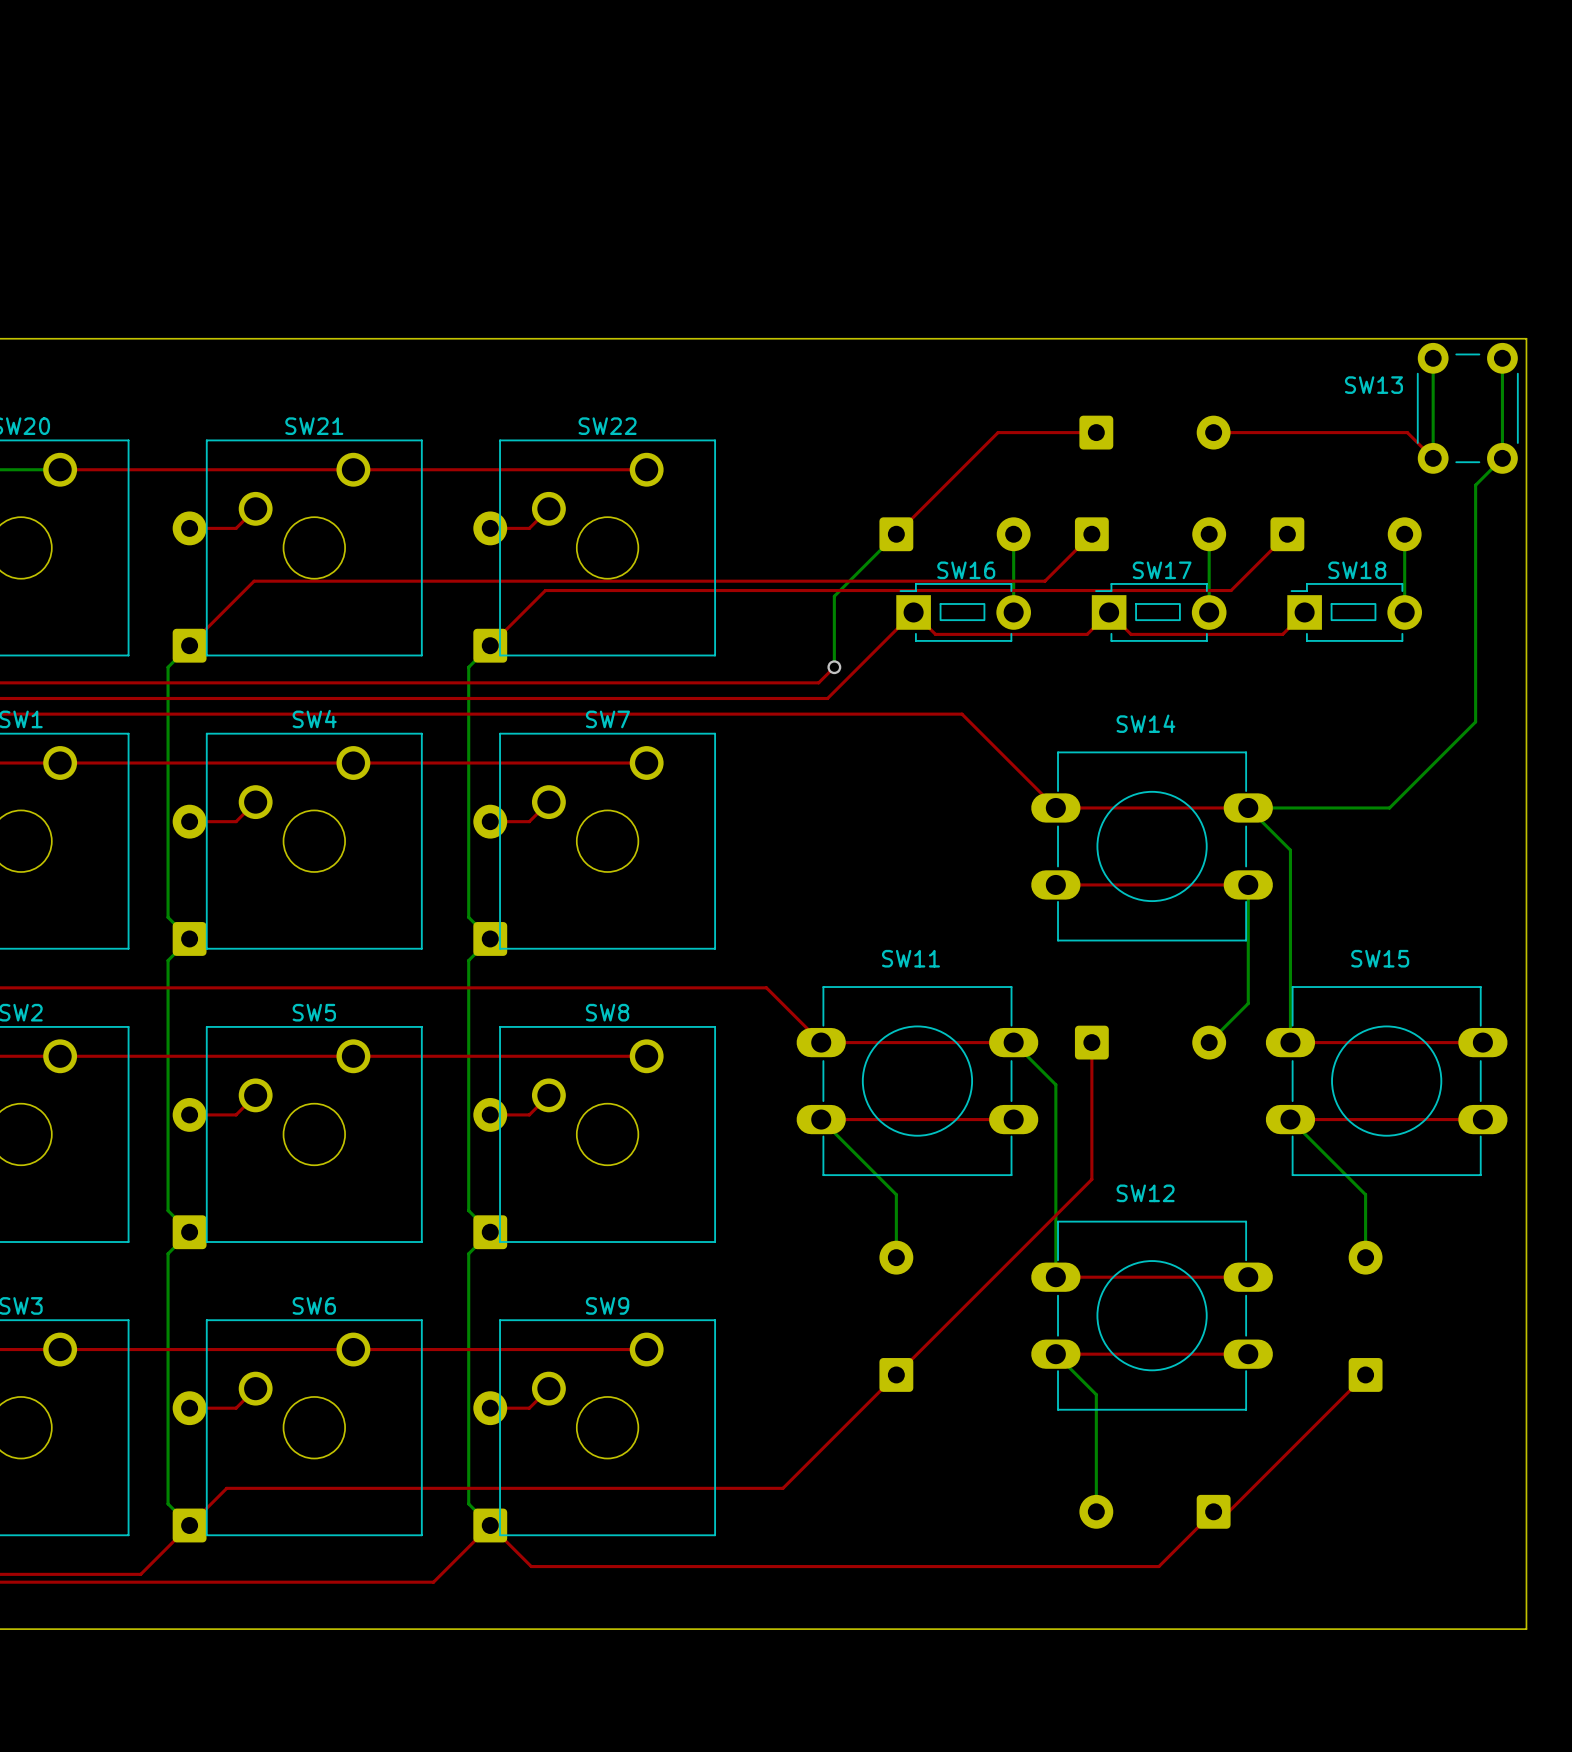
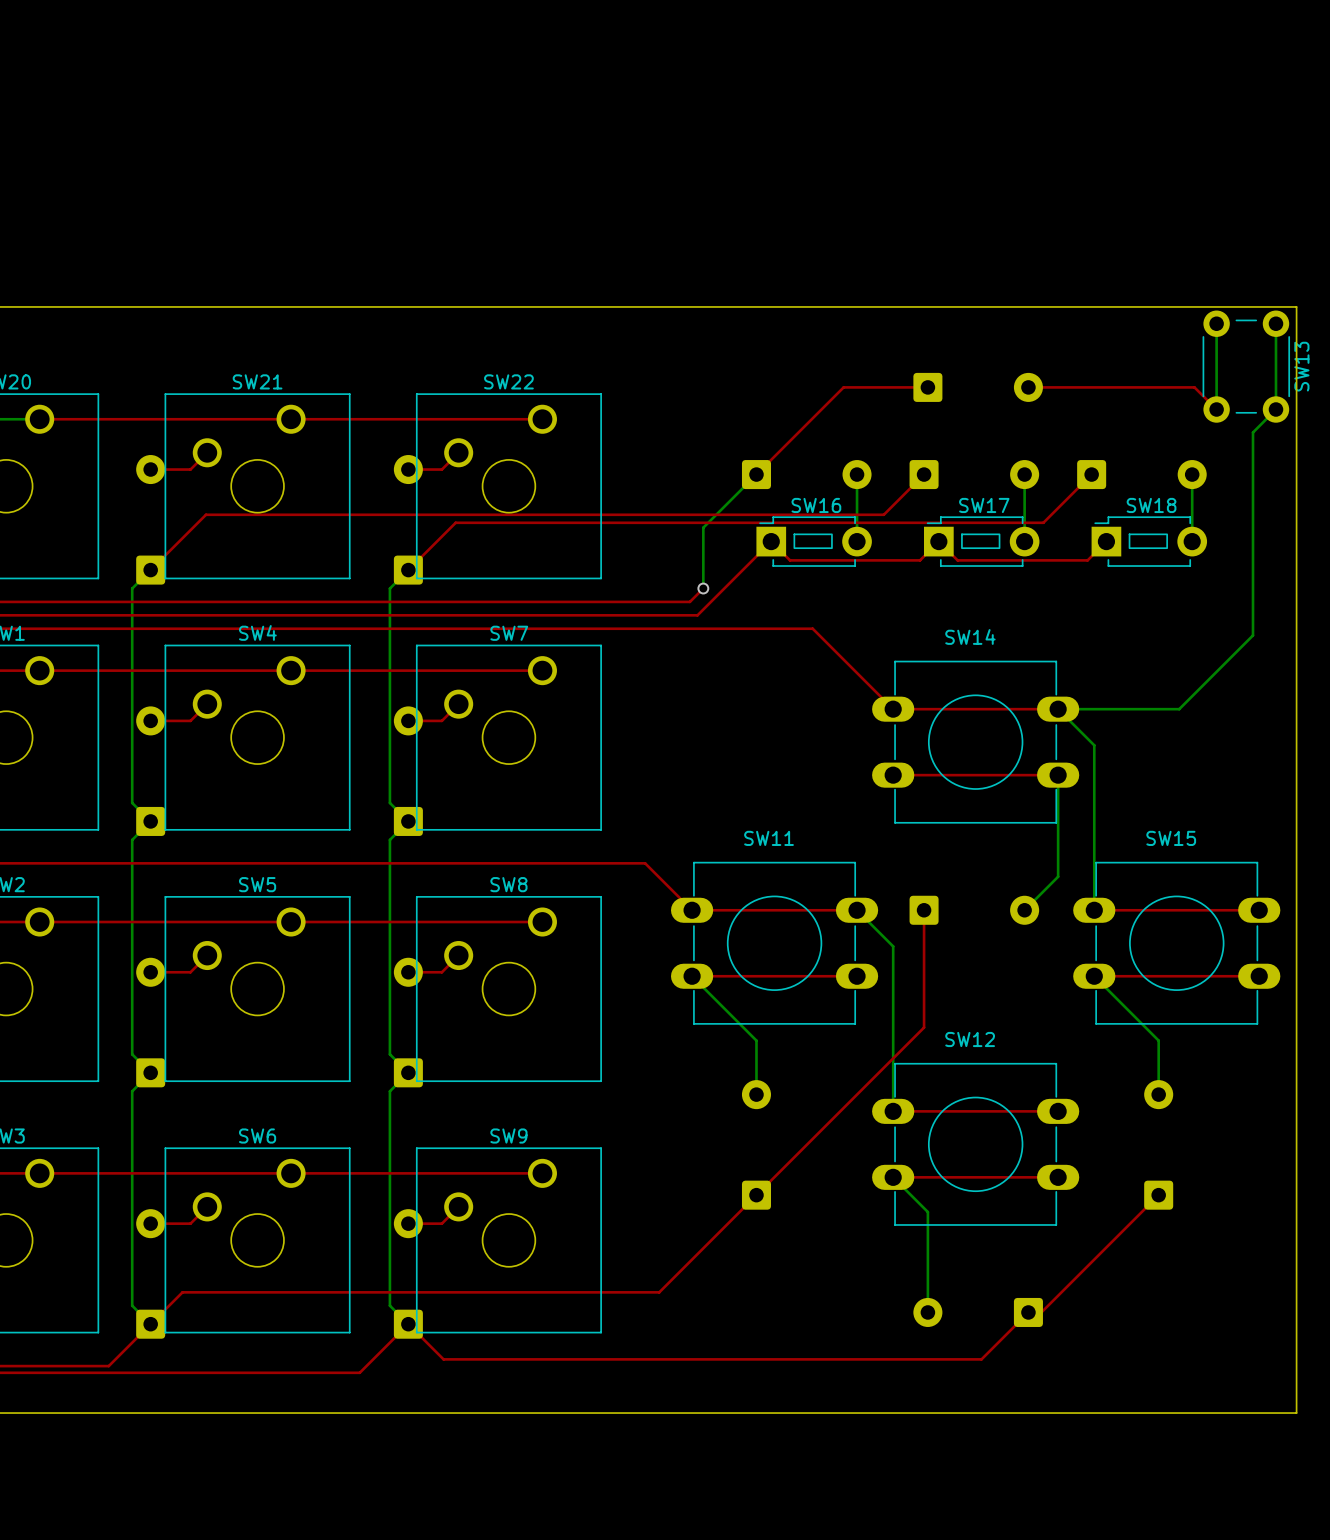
SW13 name rotation: 0° (1373, 385) -> 90° counterclockwise (1301, 366)
SW13 name position: SW13 (1373, 385) -> SW13 (1301, 366)

